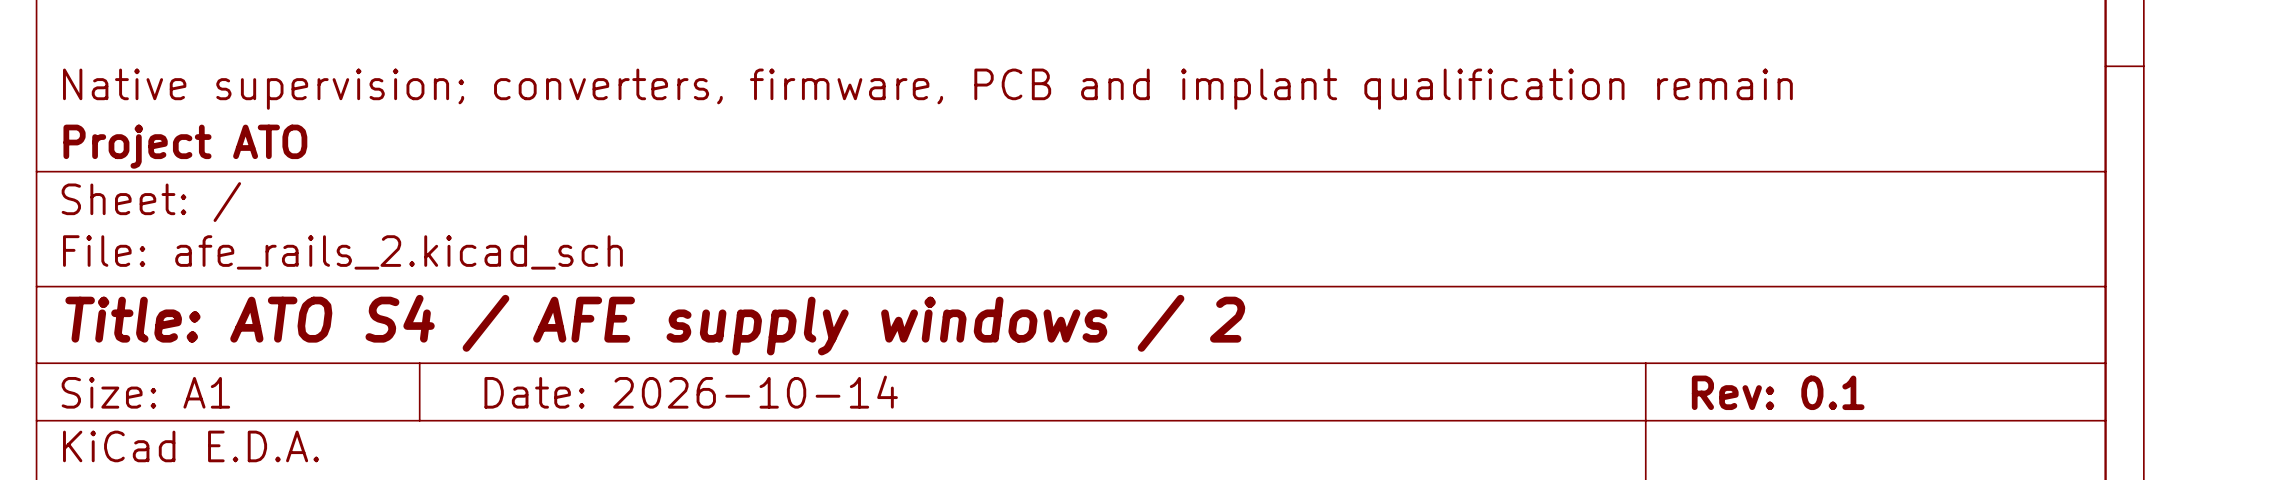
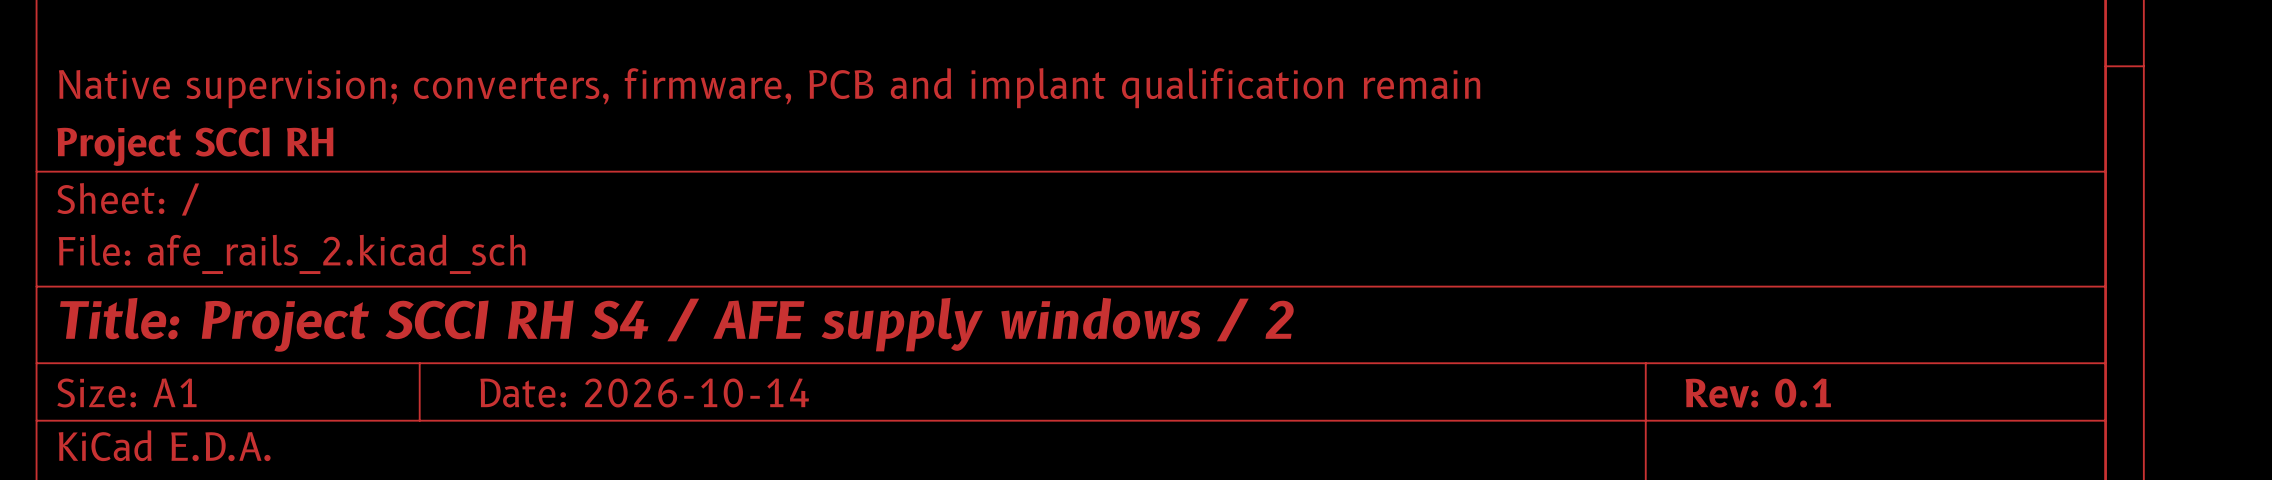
title block: Project ATO (185, 146) -> Project SCCI RH (195, 146)
title block: Title: ATO S4 / AFE supply windows / 2 (655, 325) -> Title: Project SCCI RH S4 / AFE supply windows / 2 (676, 324)

